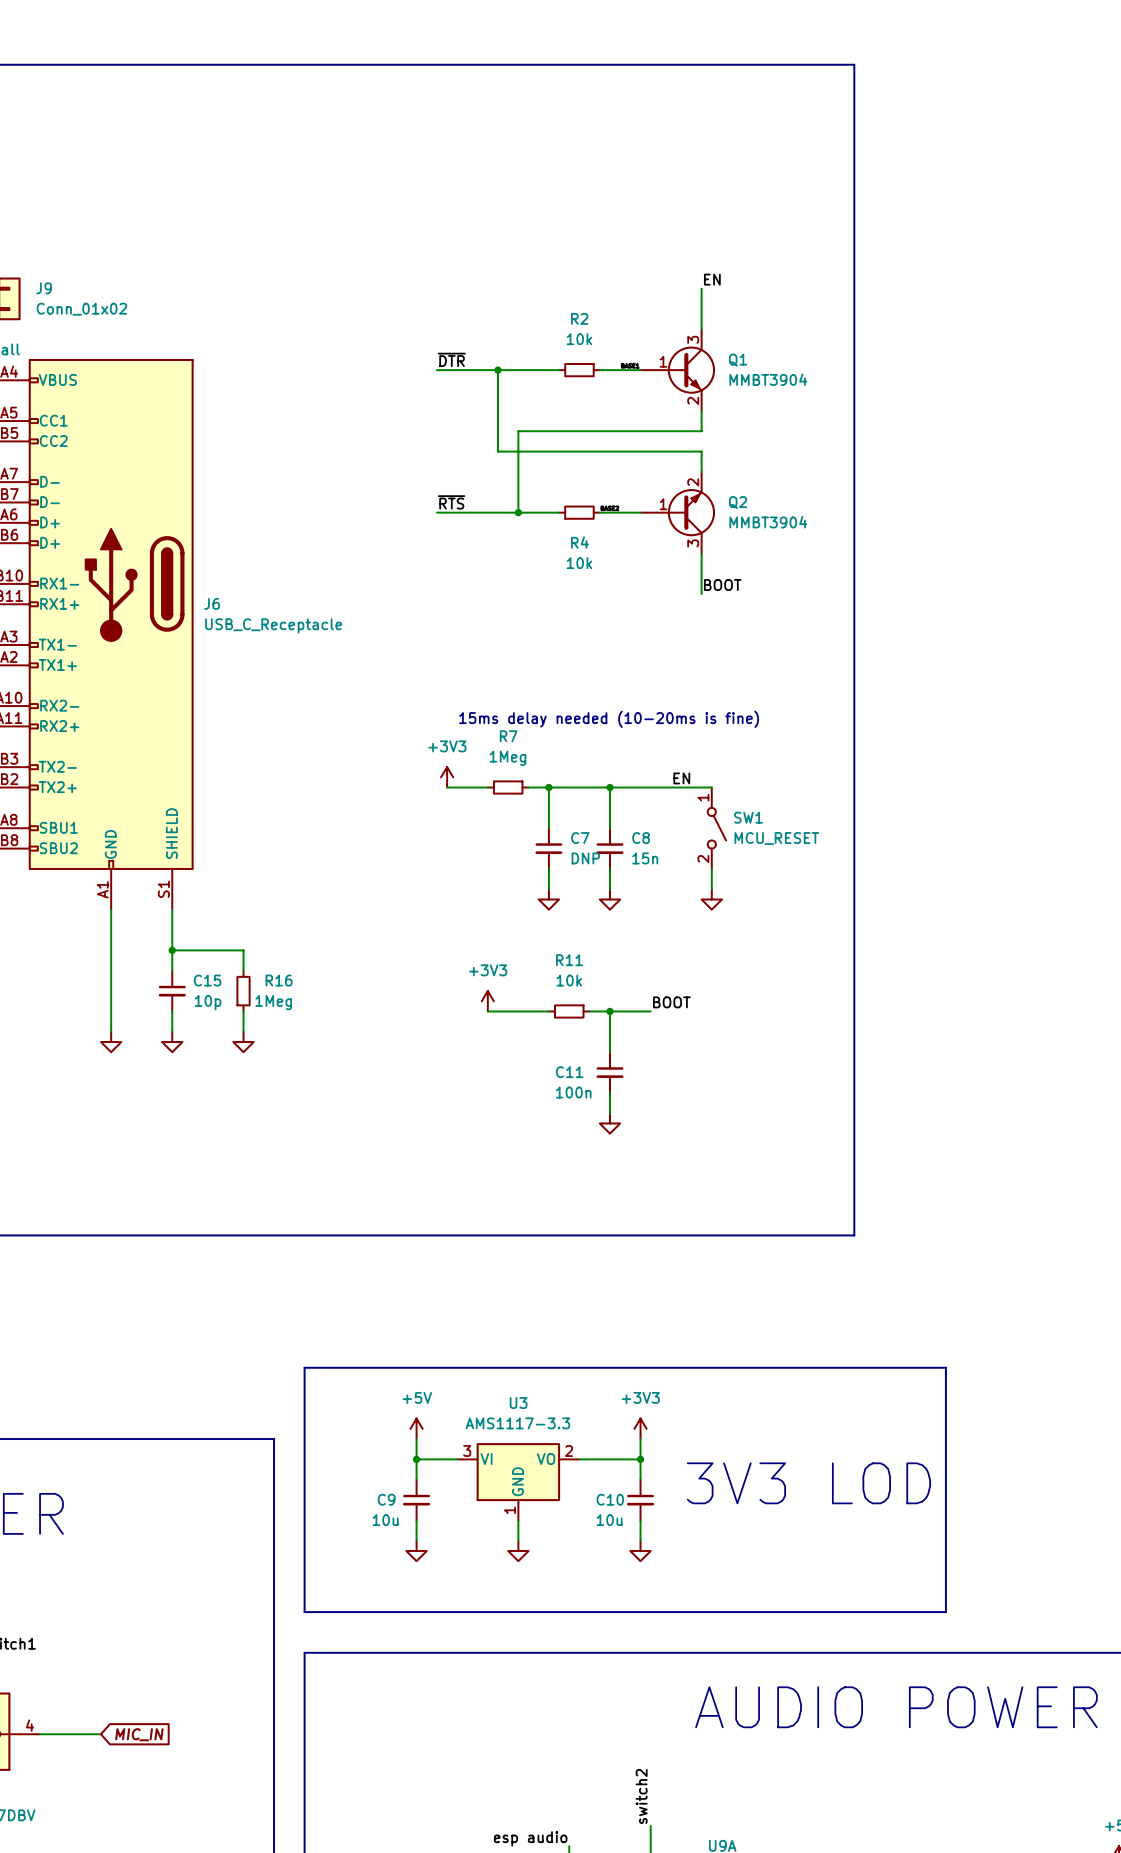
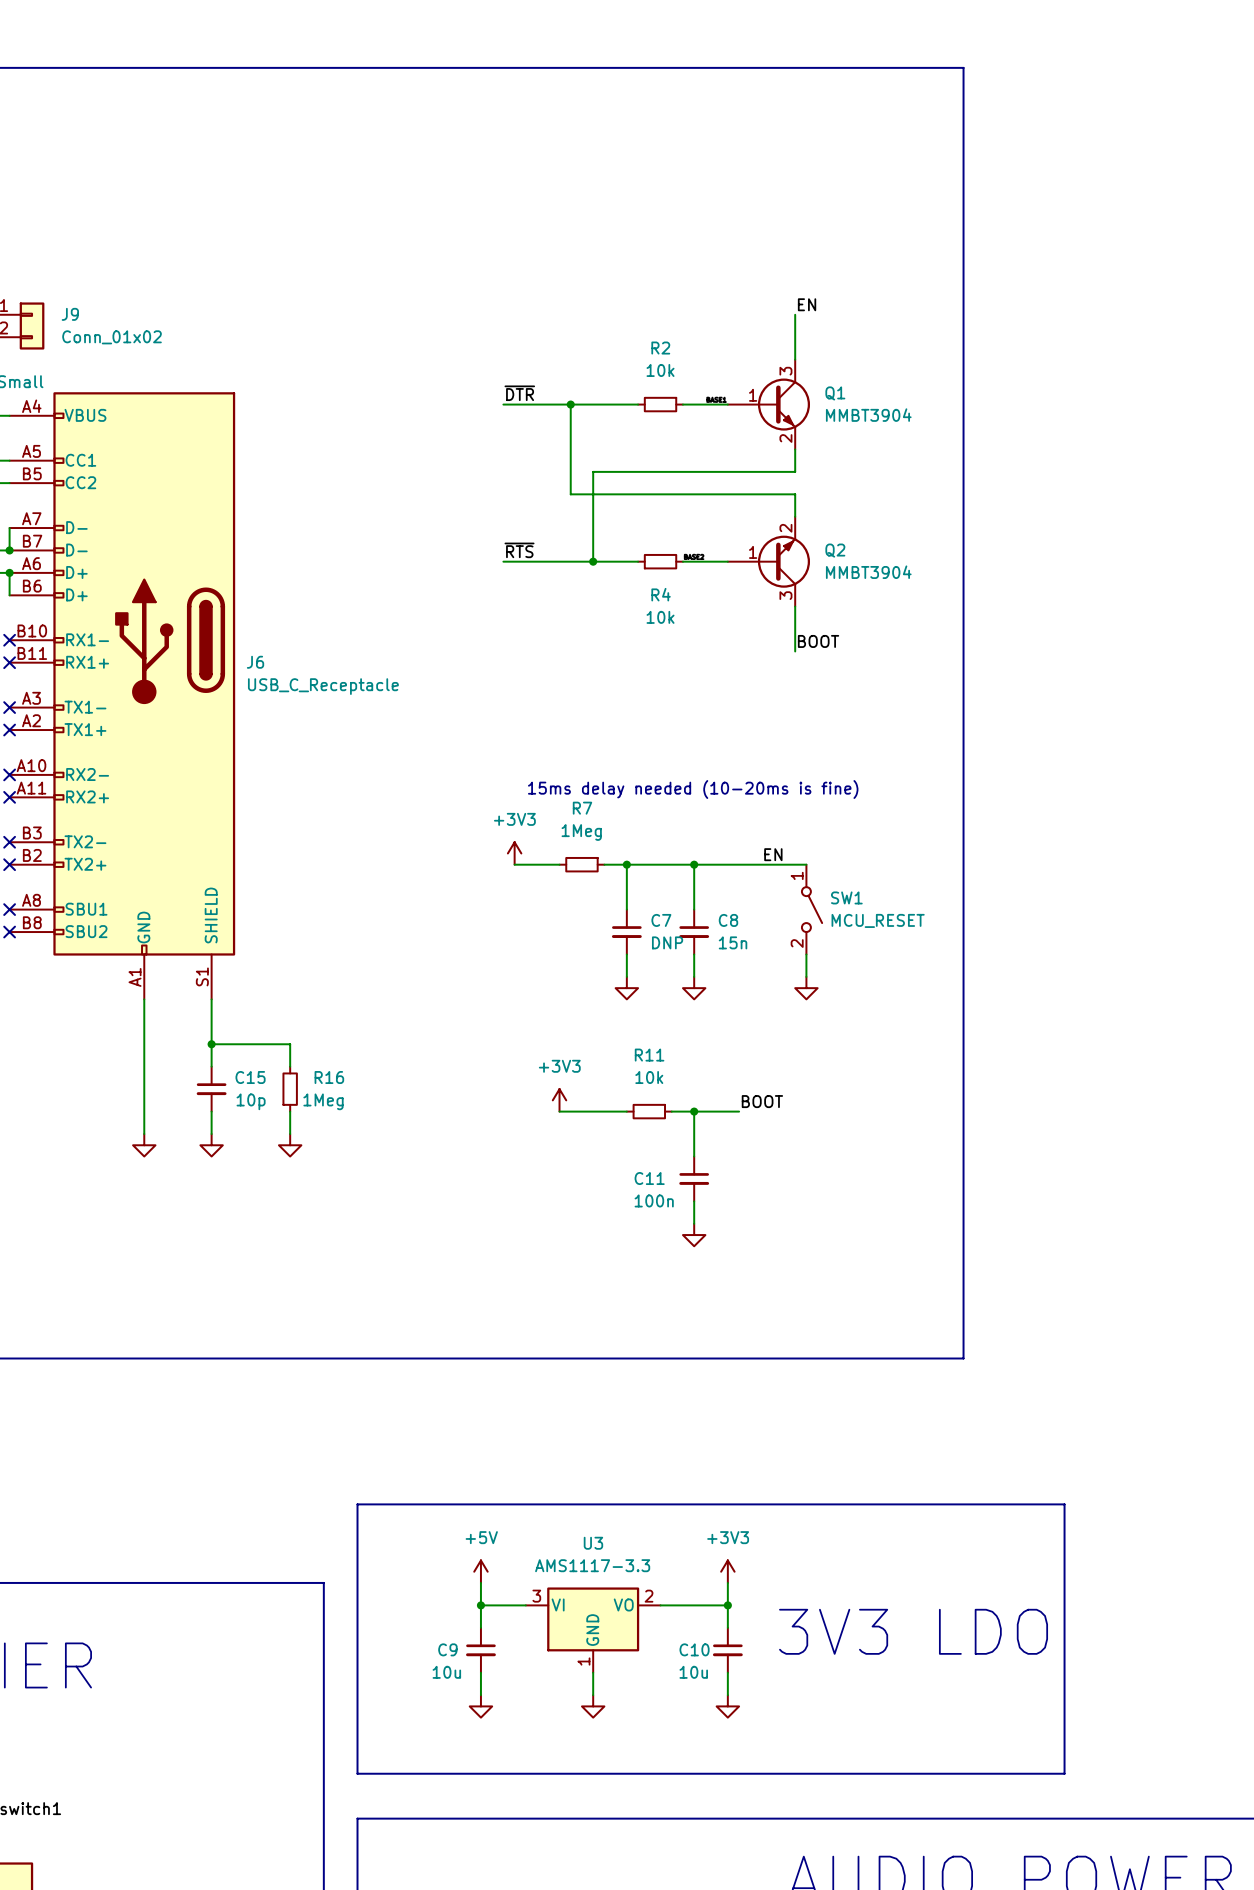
text: 3V3 LOD (808, 1483) -> 3V3 LDO (913, 1631)

